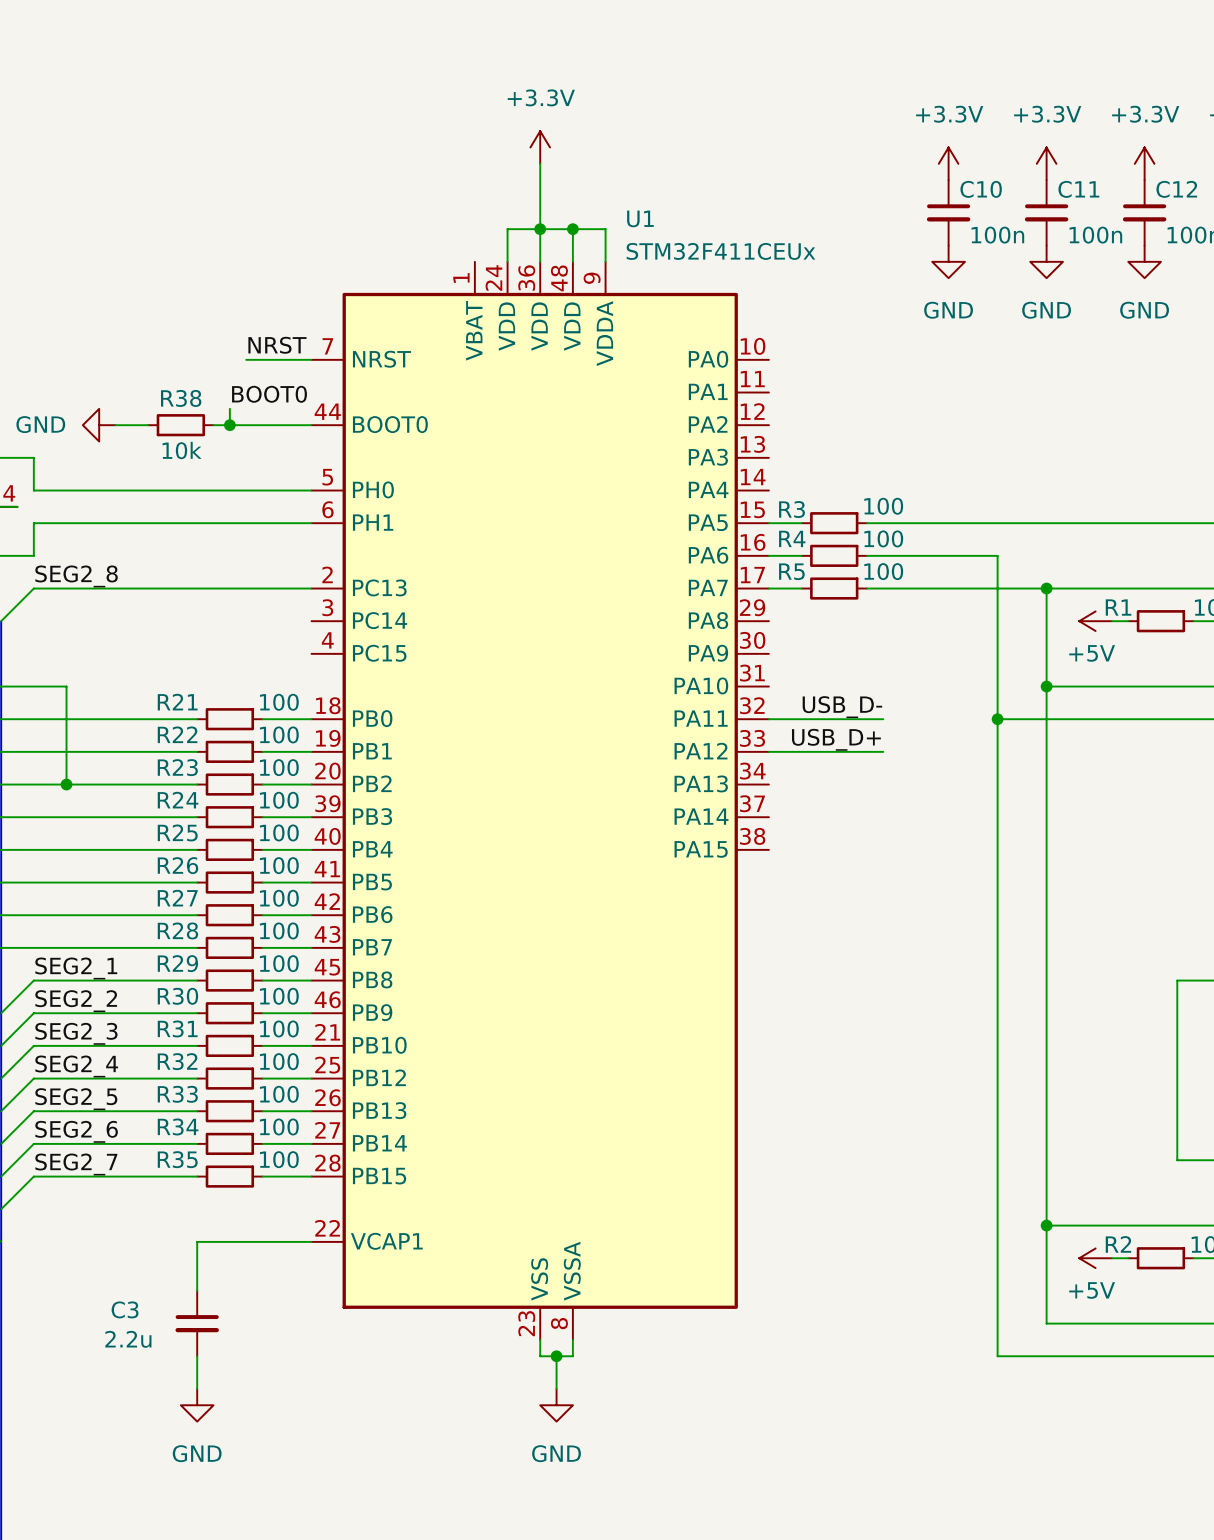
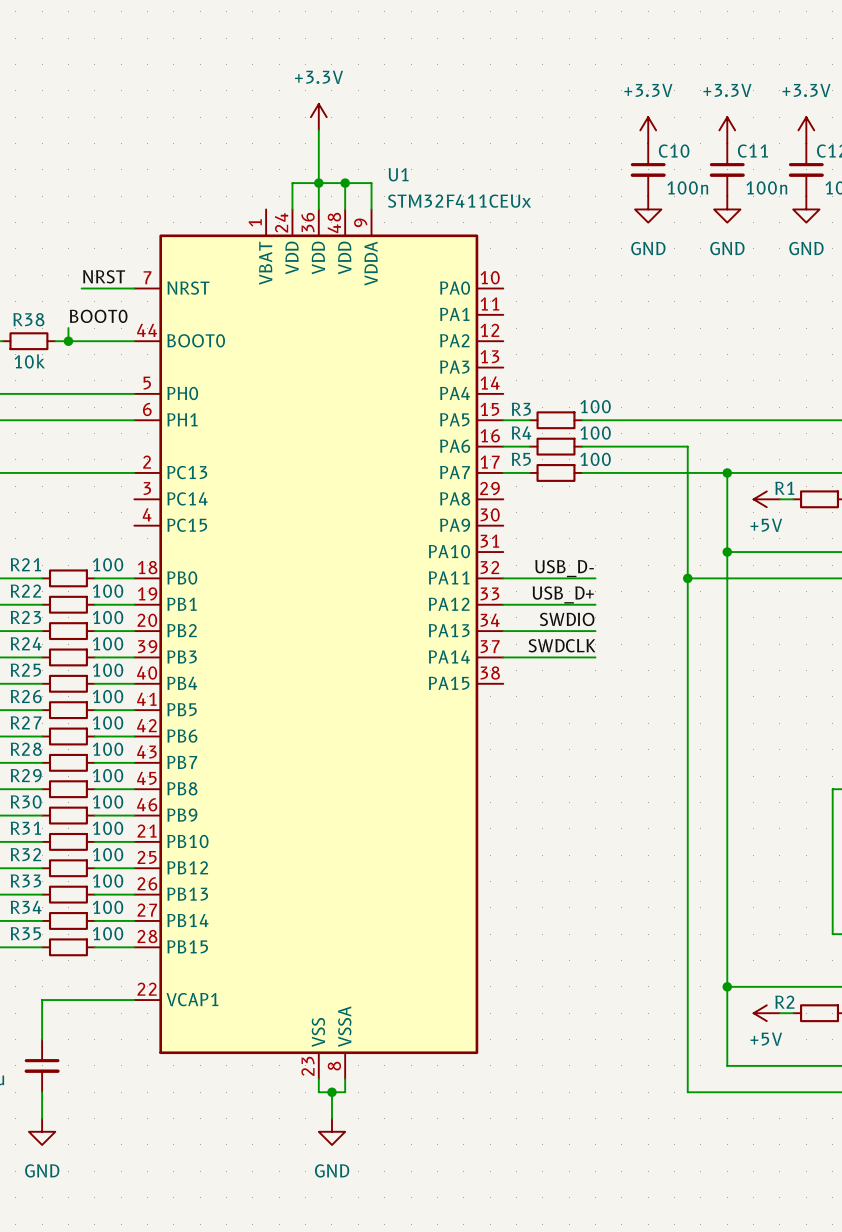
label: none -> SWDIO (567, 619)
wire: none -> (503, 631) (595, 631)
label: none -> SWDCLK (562, 645)
wire: none -> (503, 657) (595, 657)

